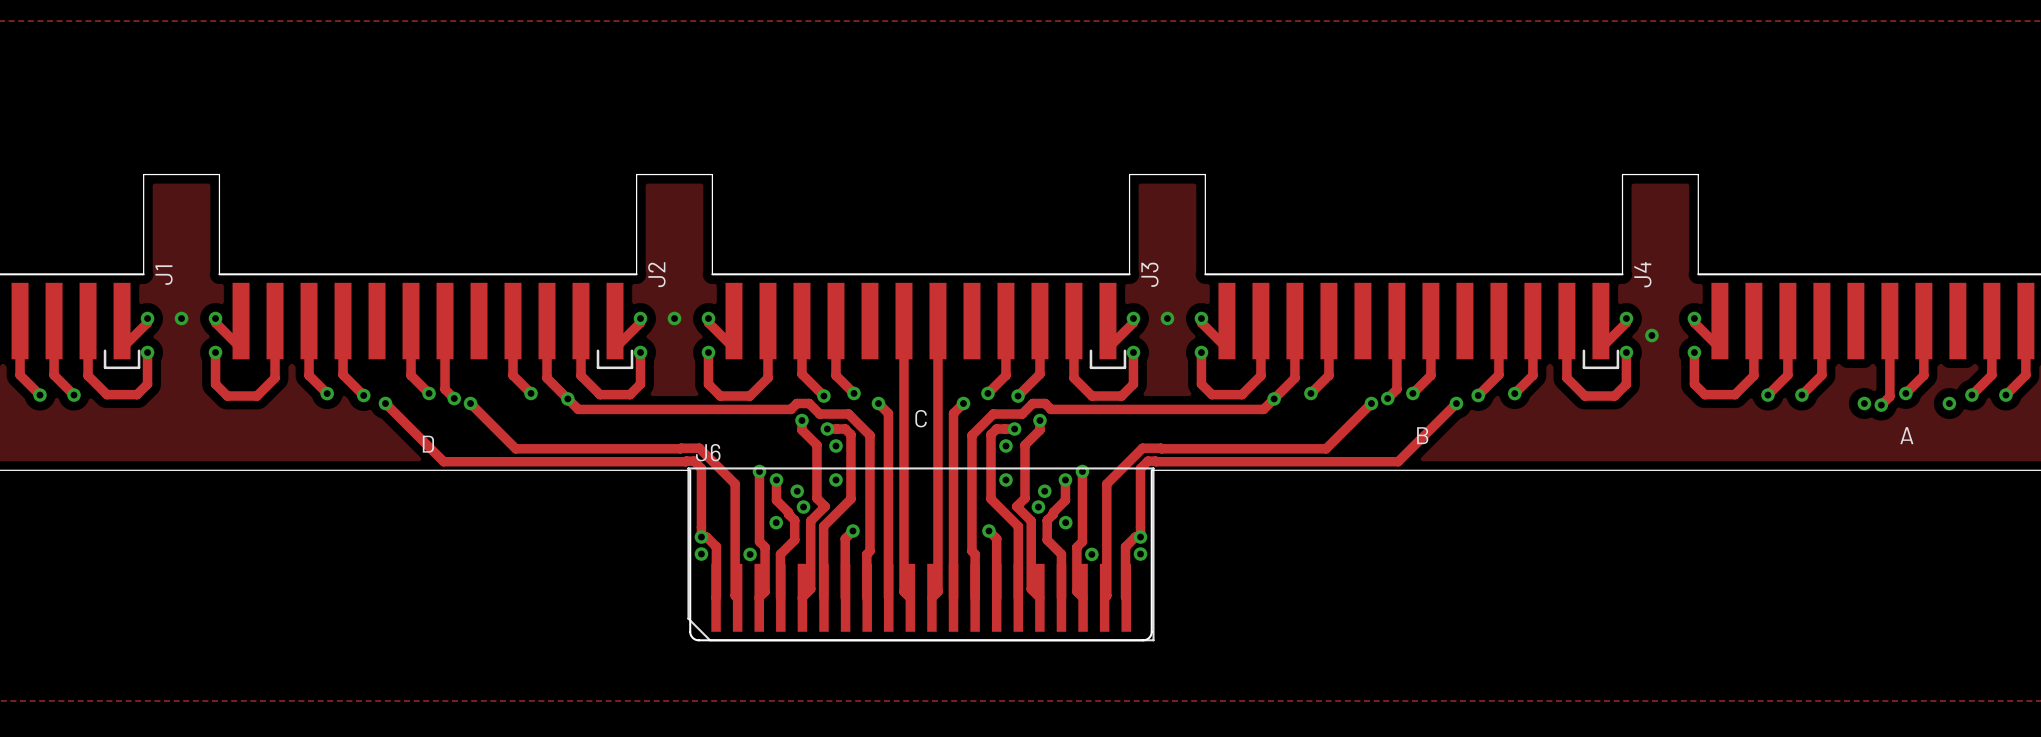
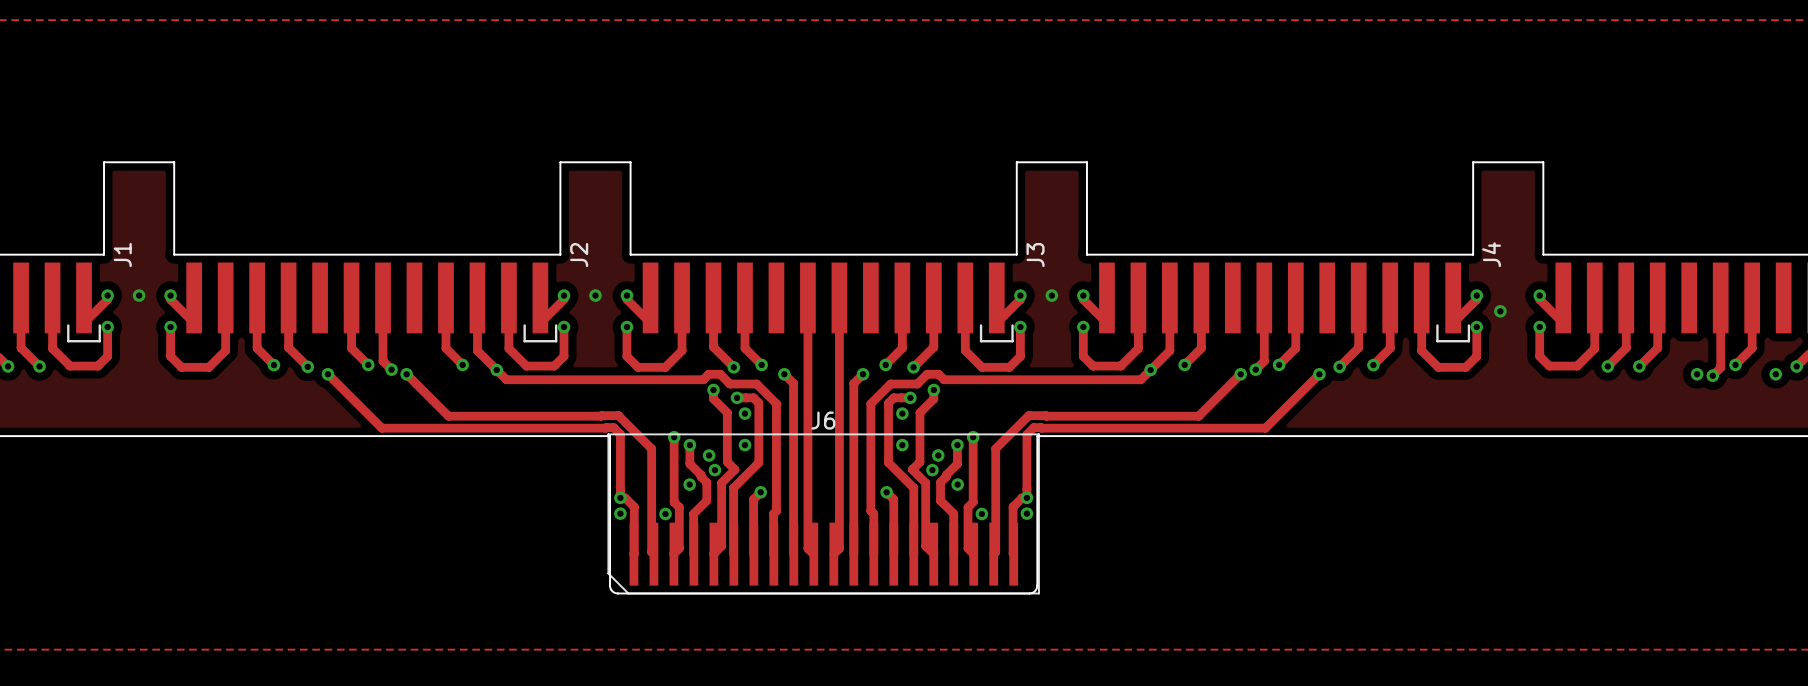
text: C (921, 418) -> none
text: B (1422, 435) -> none
text: A (1906, 435) -> none
text: D (428, 444) -> none
J6 name position: J6 (708, 452) -> J6 (823, 420)

